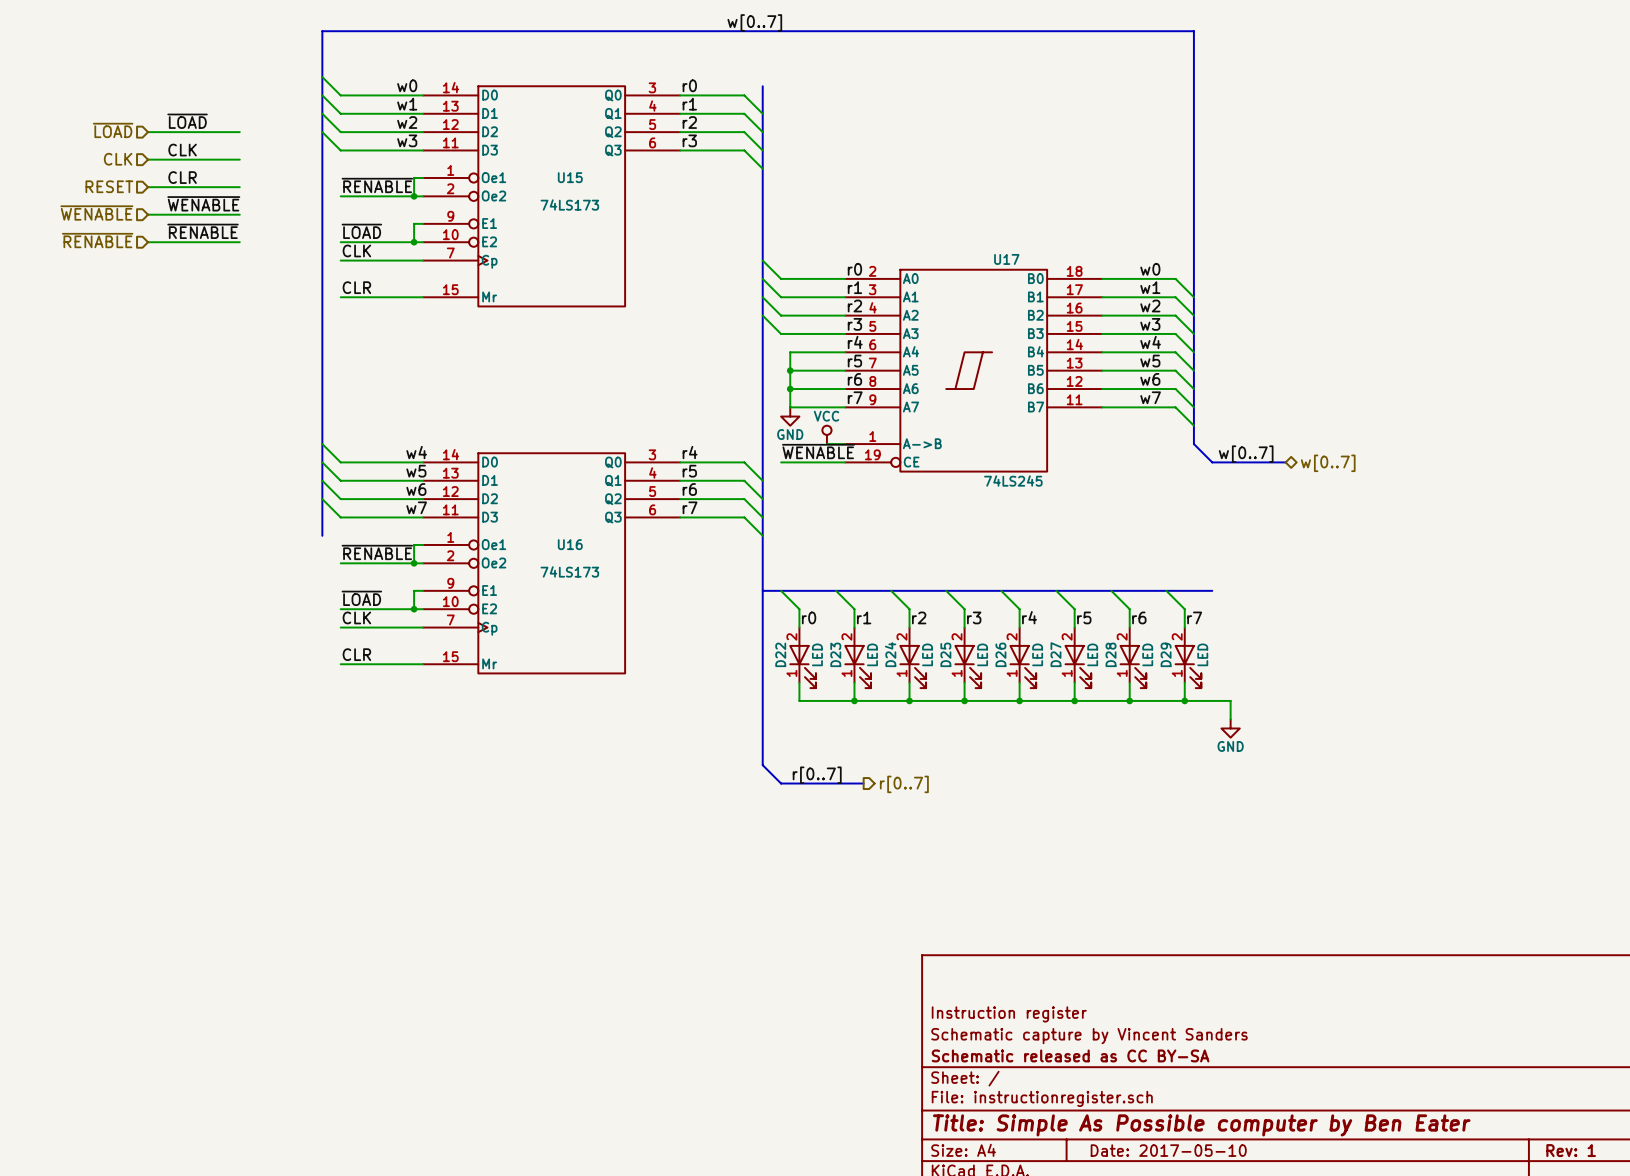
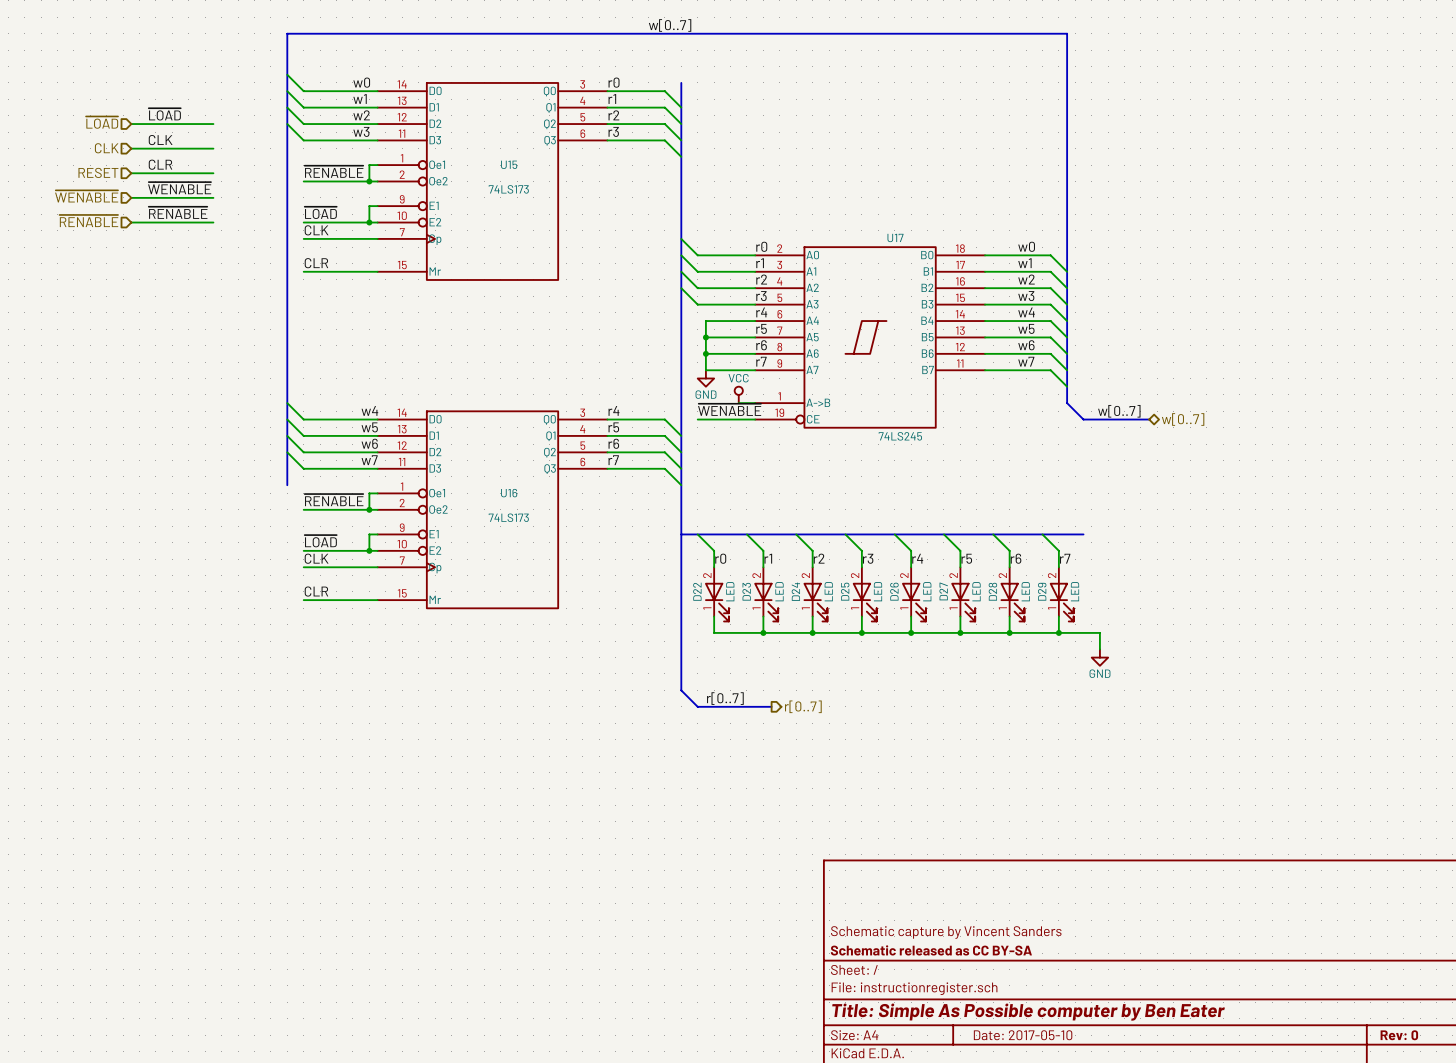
title block: Instruction register (1009, 1014) -> none
title block: Rev: 1 (1571, 1150) -> Rev: 0 (1399, 1035)

